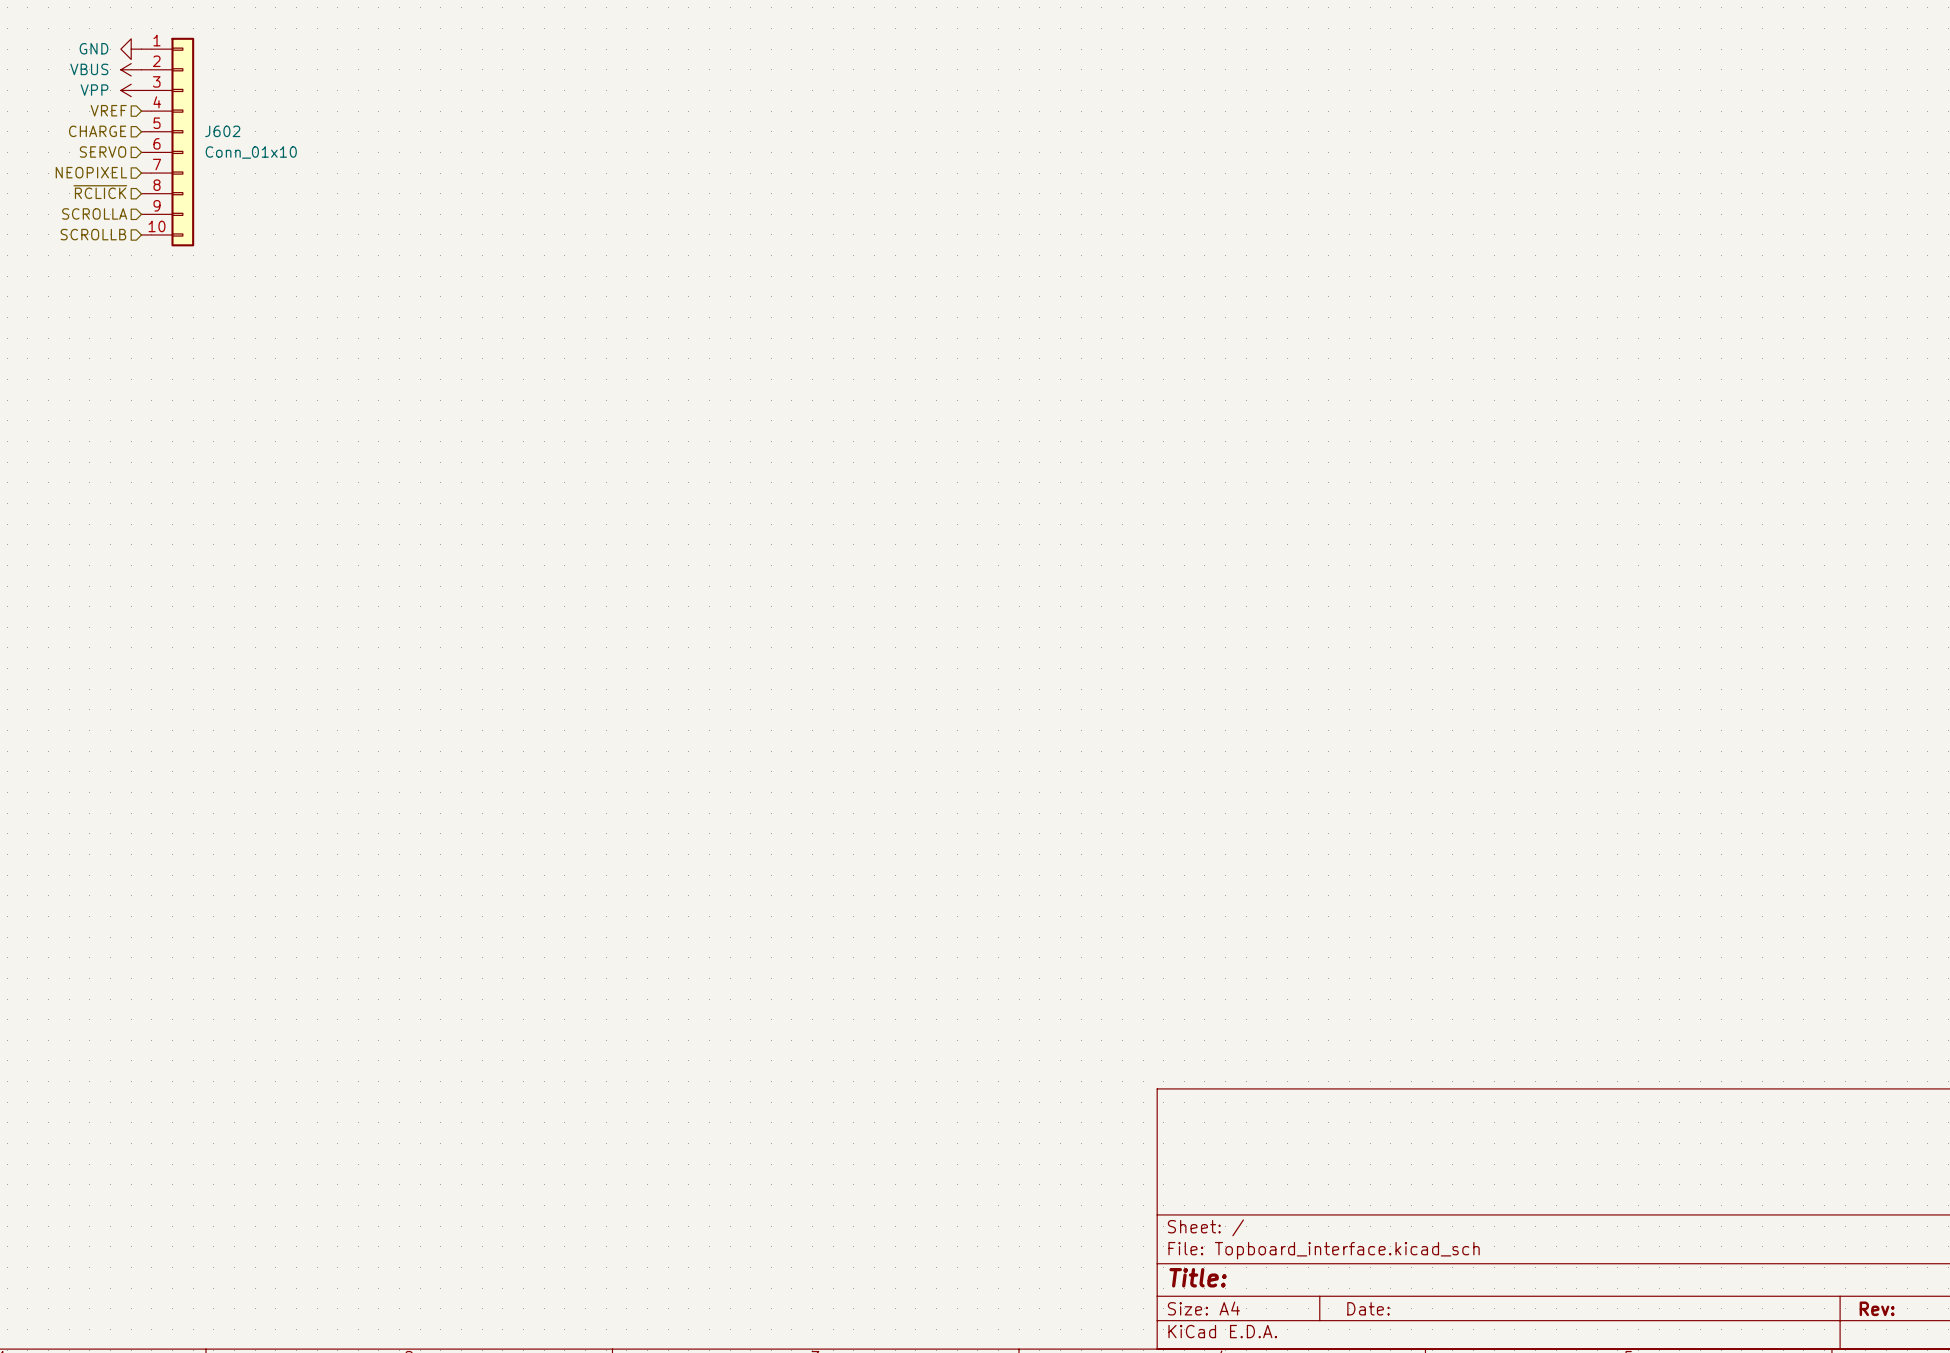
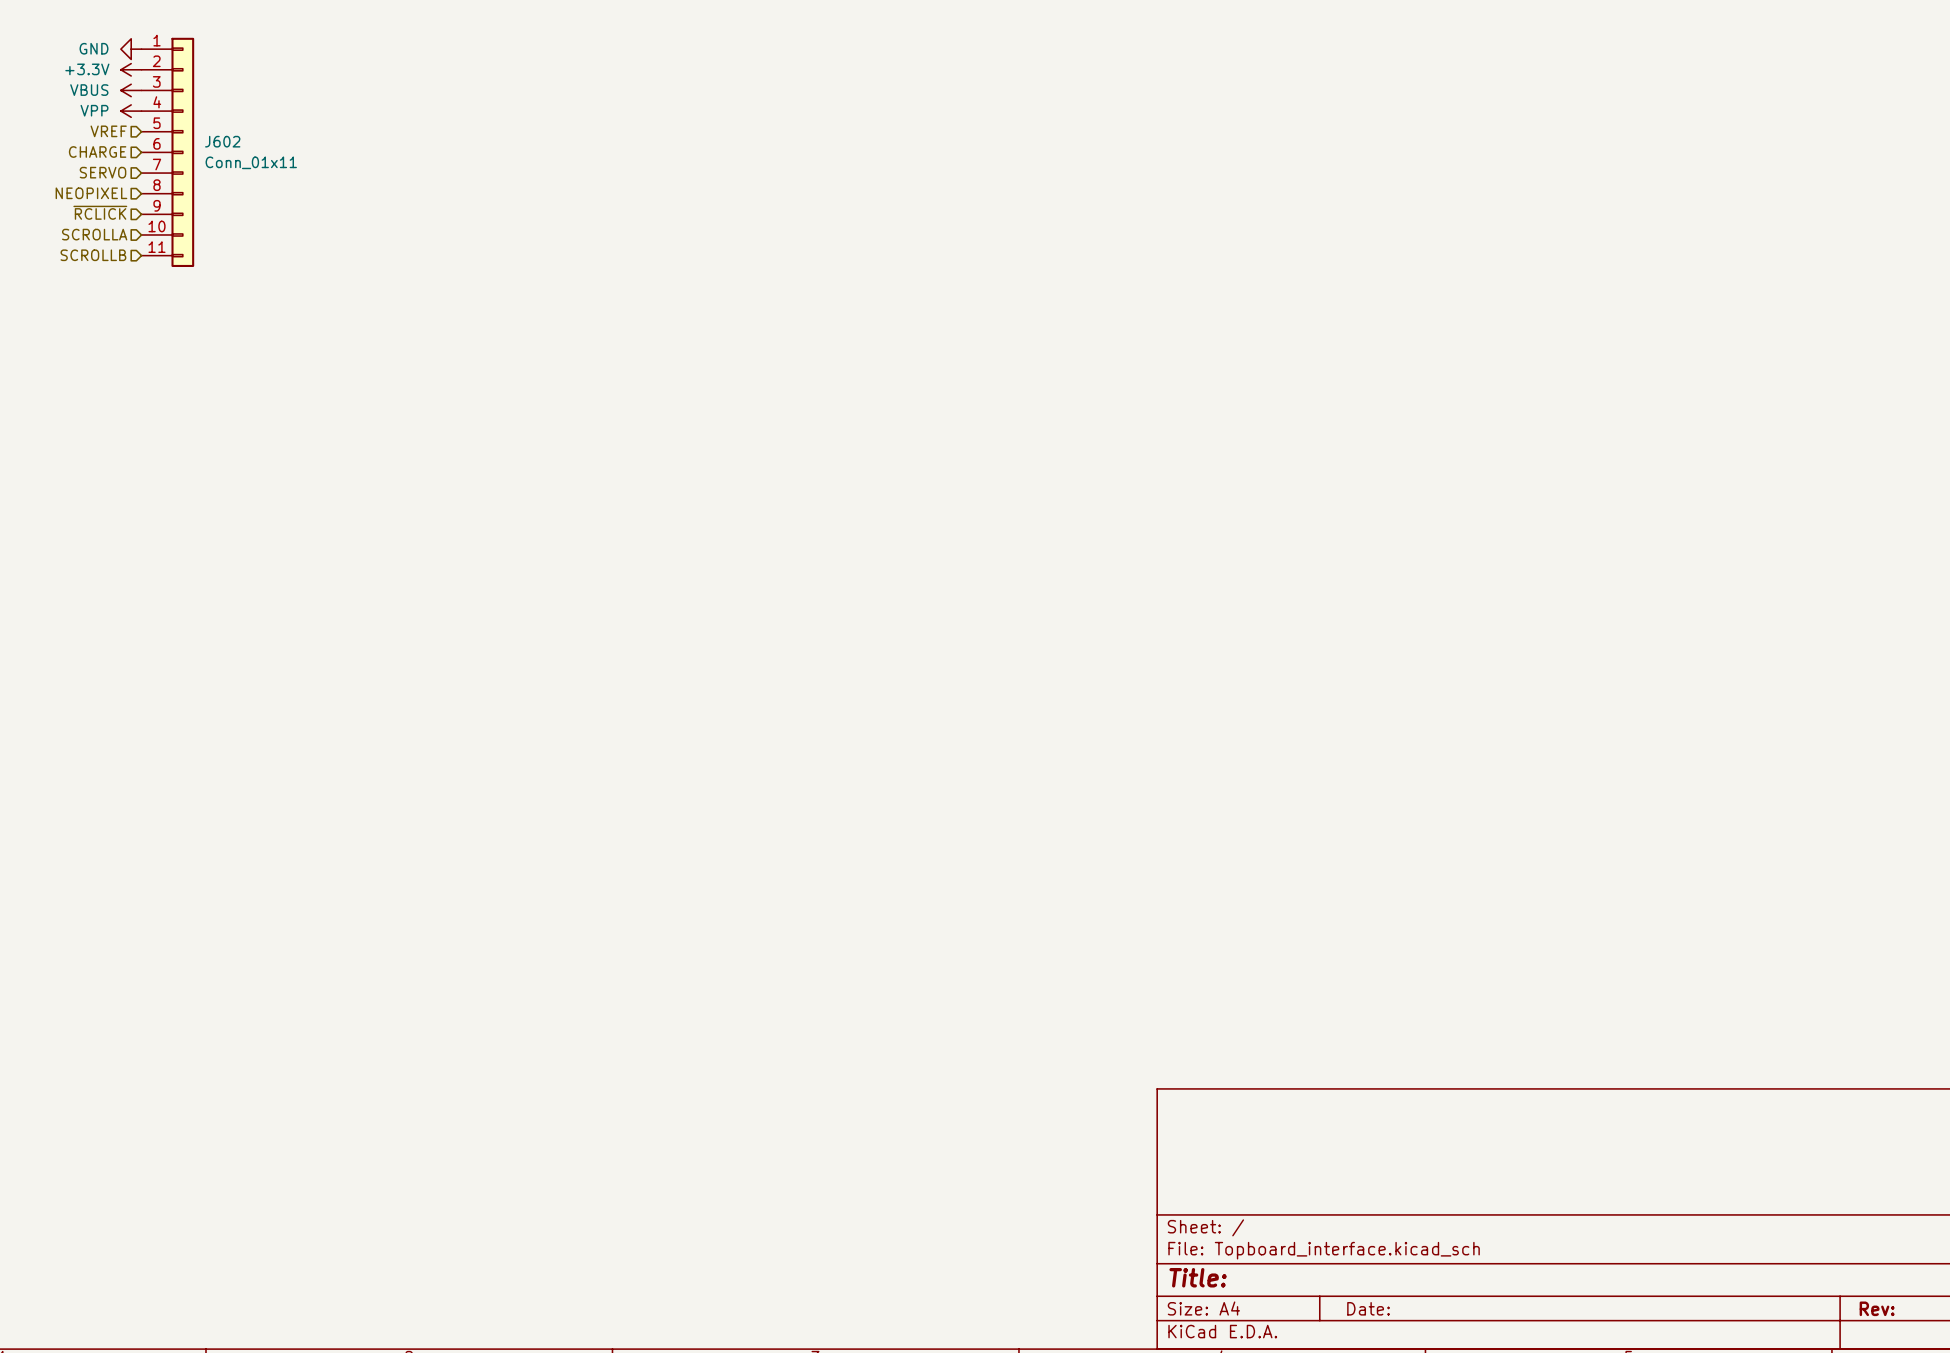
J602 symbol: [141, 37, 195, 247] -> [141, 37, 195, 268]
power symbol: VBUS (131, 69) -> +3.3V (131, 69)
power symbol: VPP (131, 90) -> VBUS (131, 90)
hierarchical label: VREF (108, 110) -> none
power symbol: none -> VPP (131, 111)
hierarchical label: CHARGE (97, 131) -> VREF (108, 131)
hierarchical label: SERVO (103, 152) -> CHARGE (97, 152)
J602 value: Conn_01x10 (251, 152) -> Conn_01x11 (251, 162)
hierarchical label: NEOPIXEL (91, 172) -> SERVO (103, 172)
hierarchical label: ~{RCLICK} (100, 192) -> NEOPIXEL (91, 193)
hierarchical label: SCROLLA (94, 213) -> ~{RCLICK} (100, 212)
hierarchical label: SCROLLB (93, 234) -> SCROLLA (94, 234)
hierarchical label: none -> SCROLLB (93, 255)

